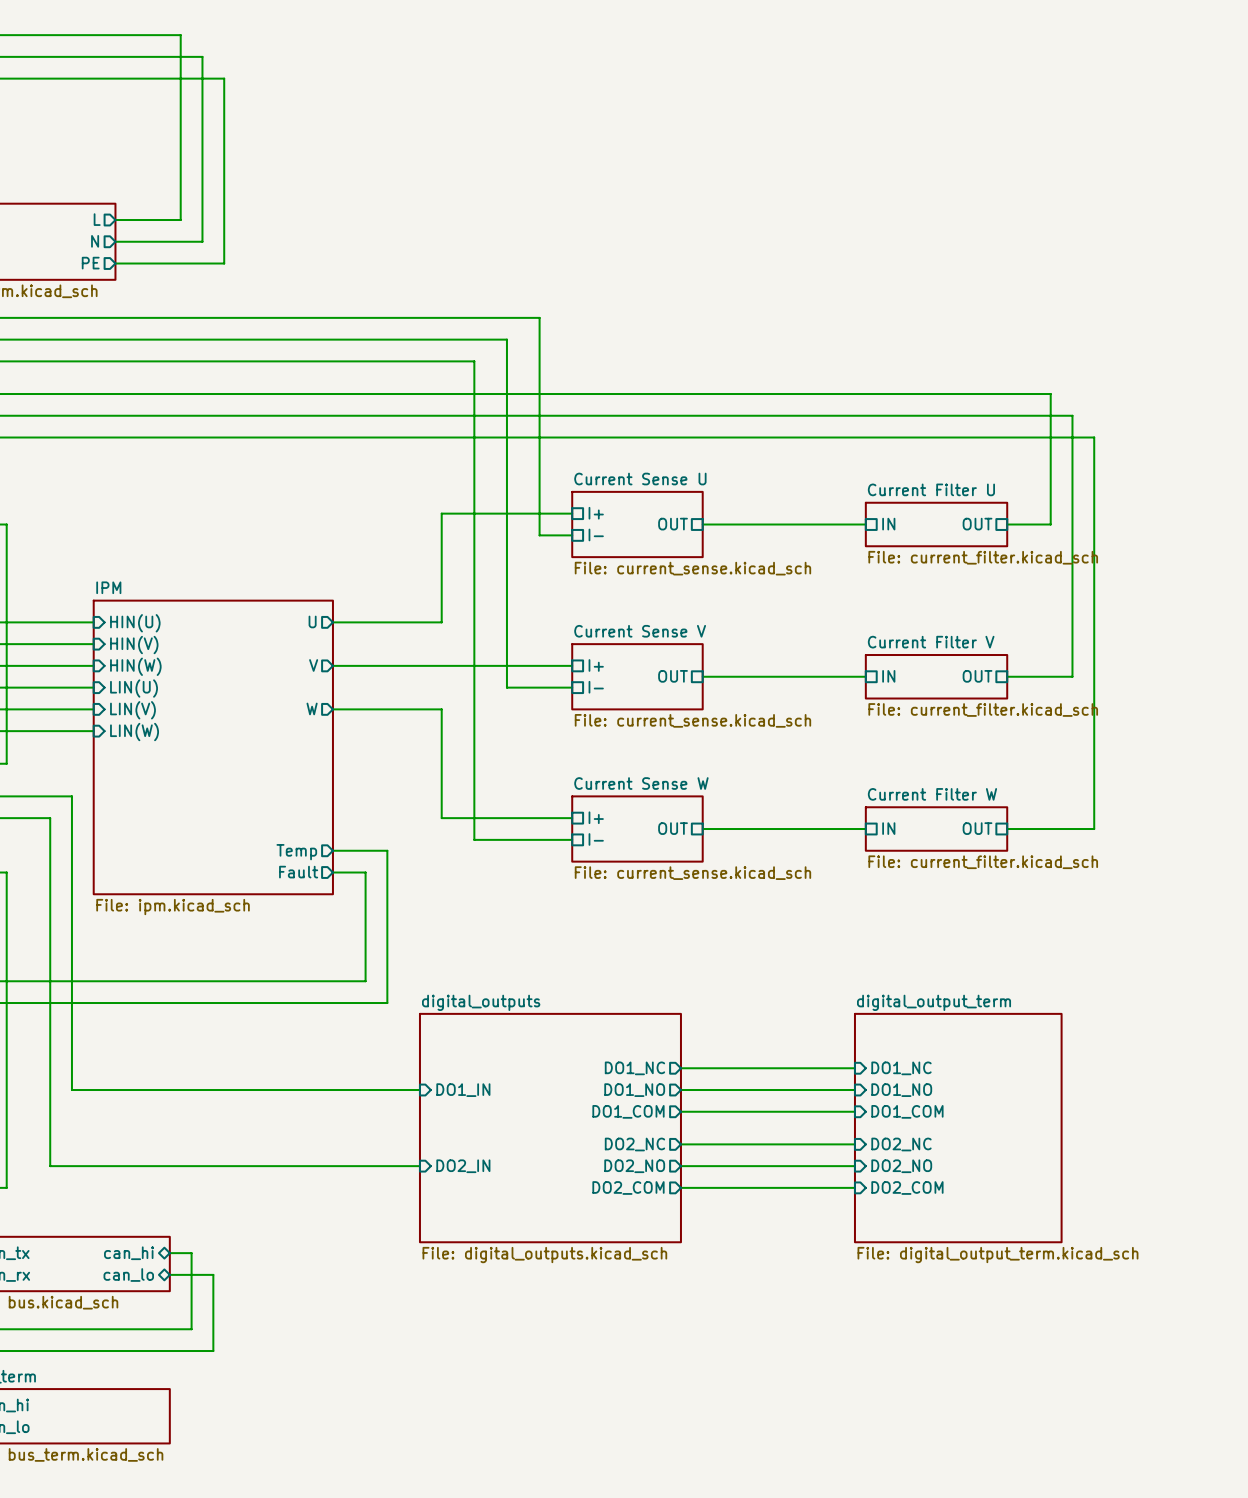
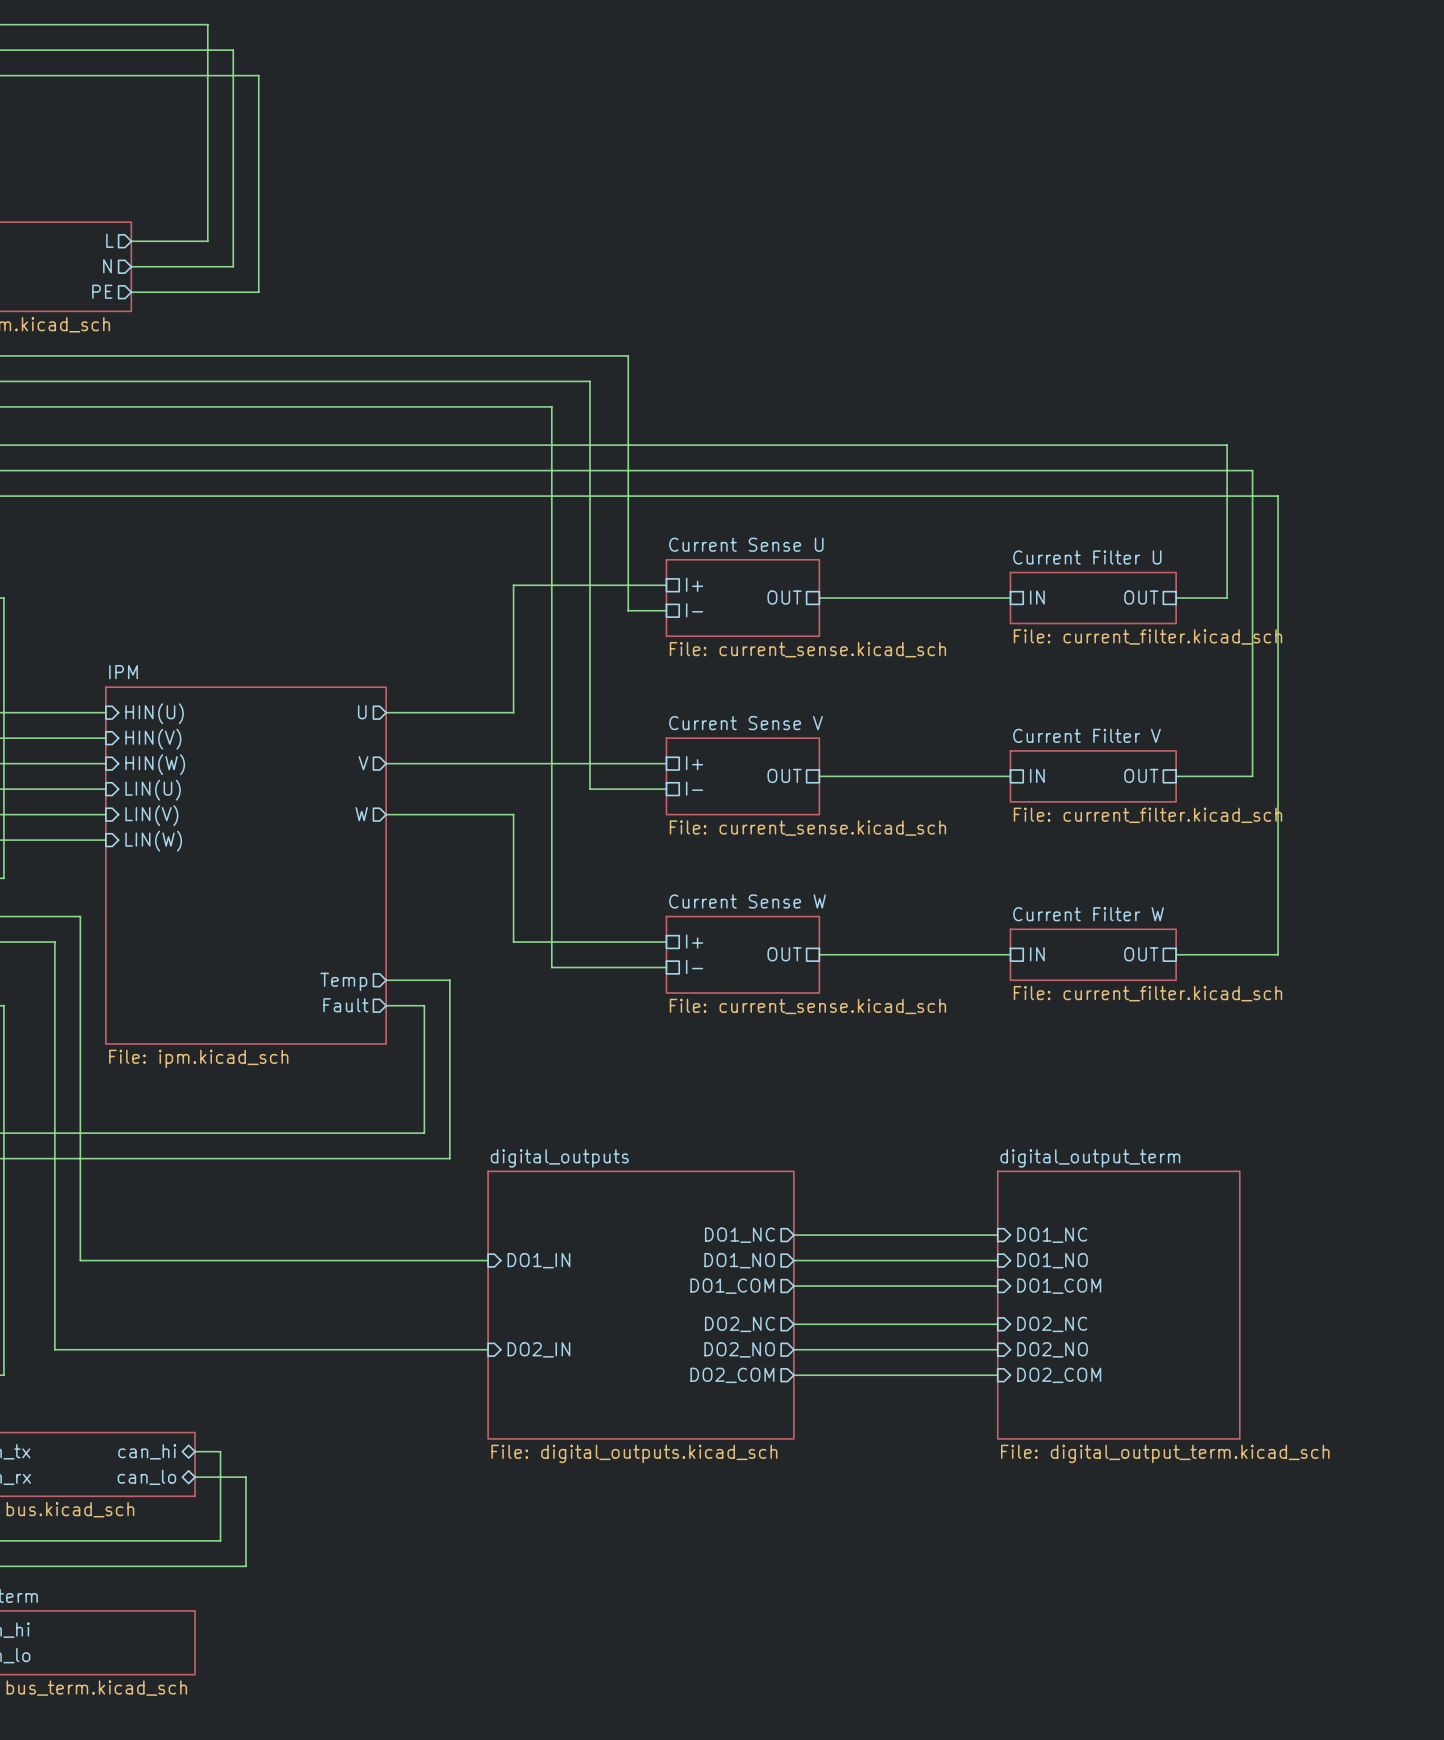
sheet IPM shape: [93, 599, 334, 895] -> [105, 686, 387, 1045]

